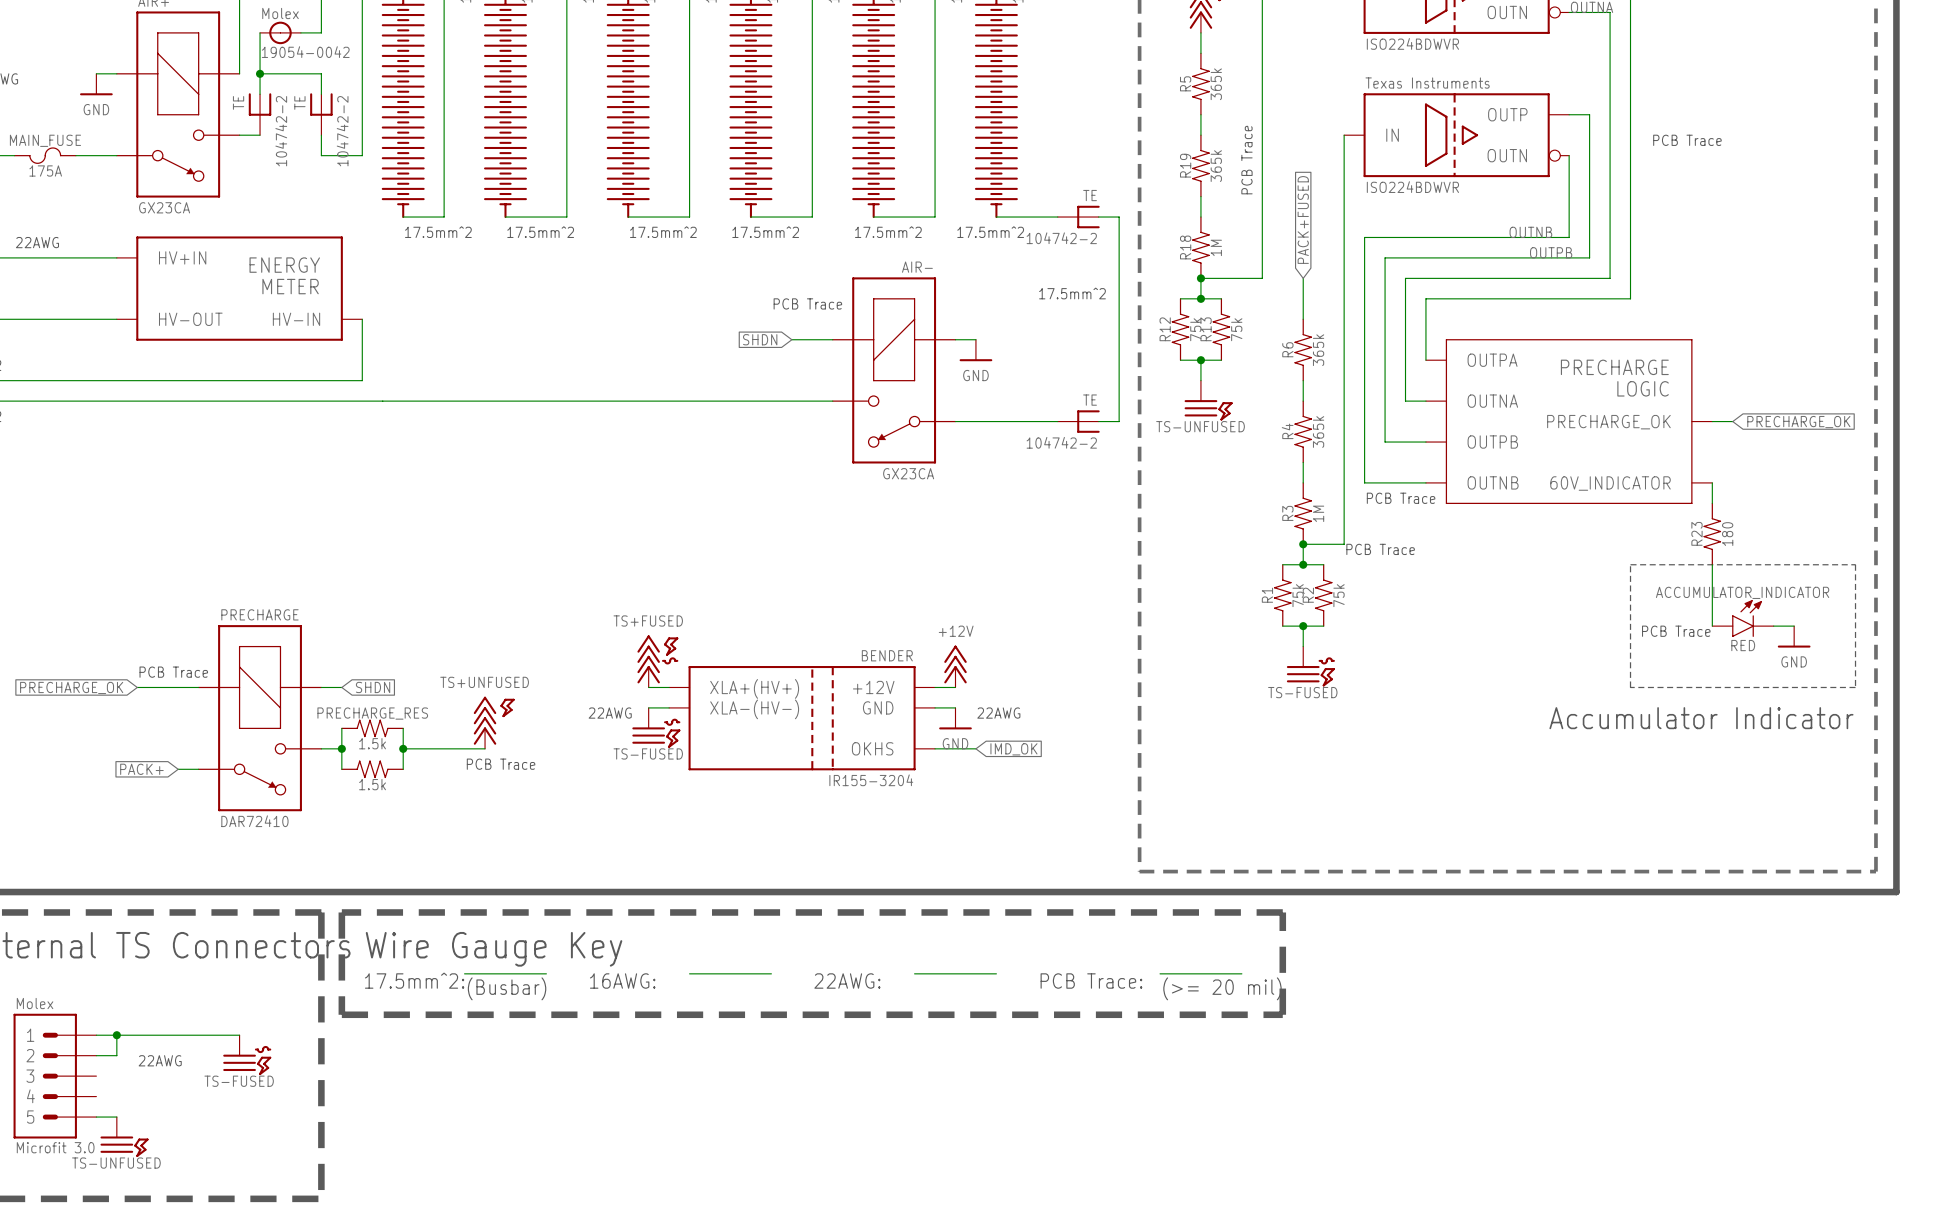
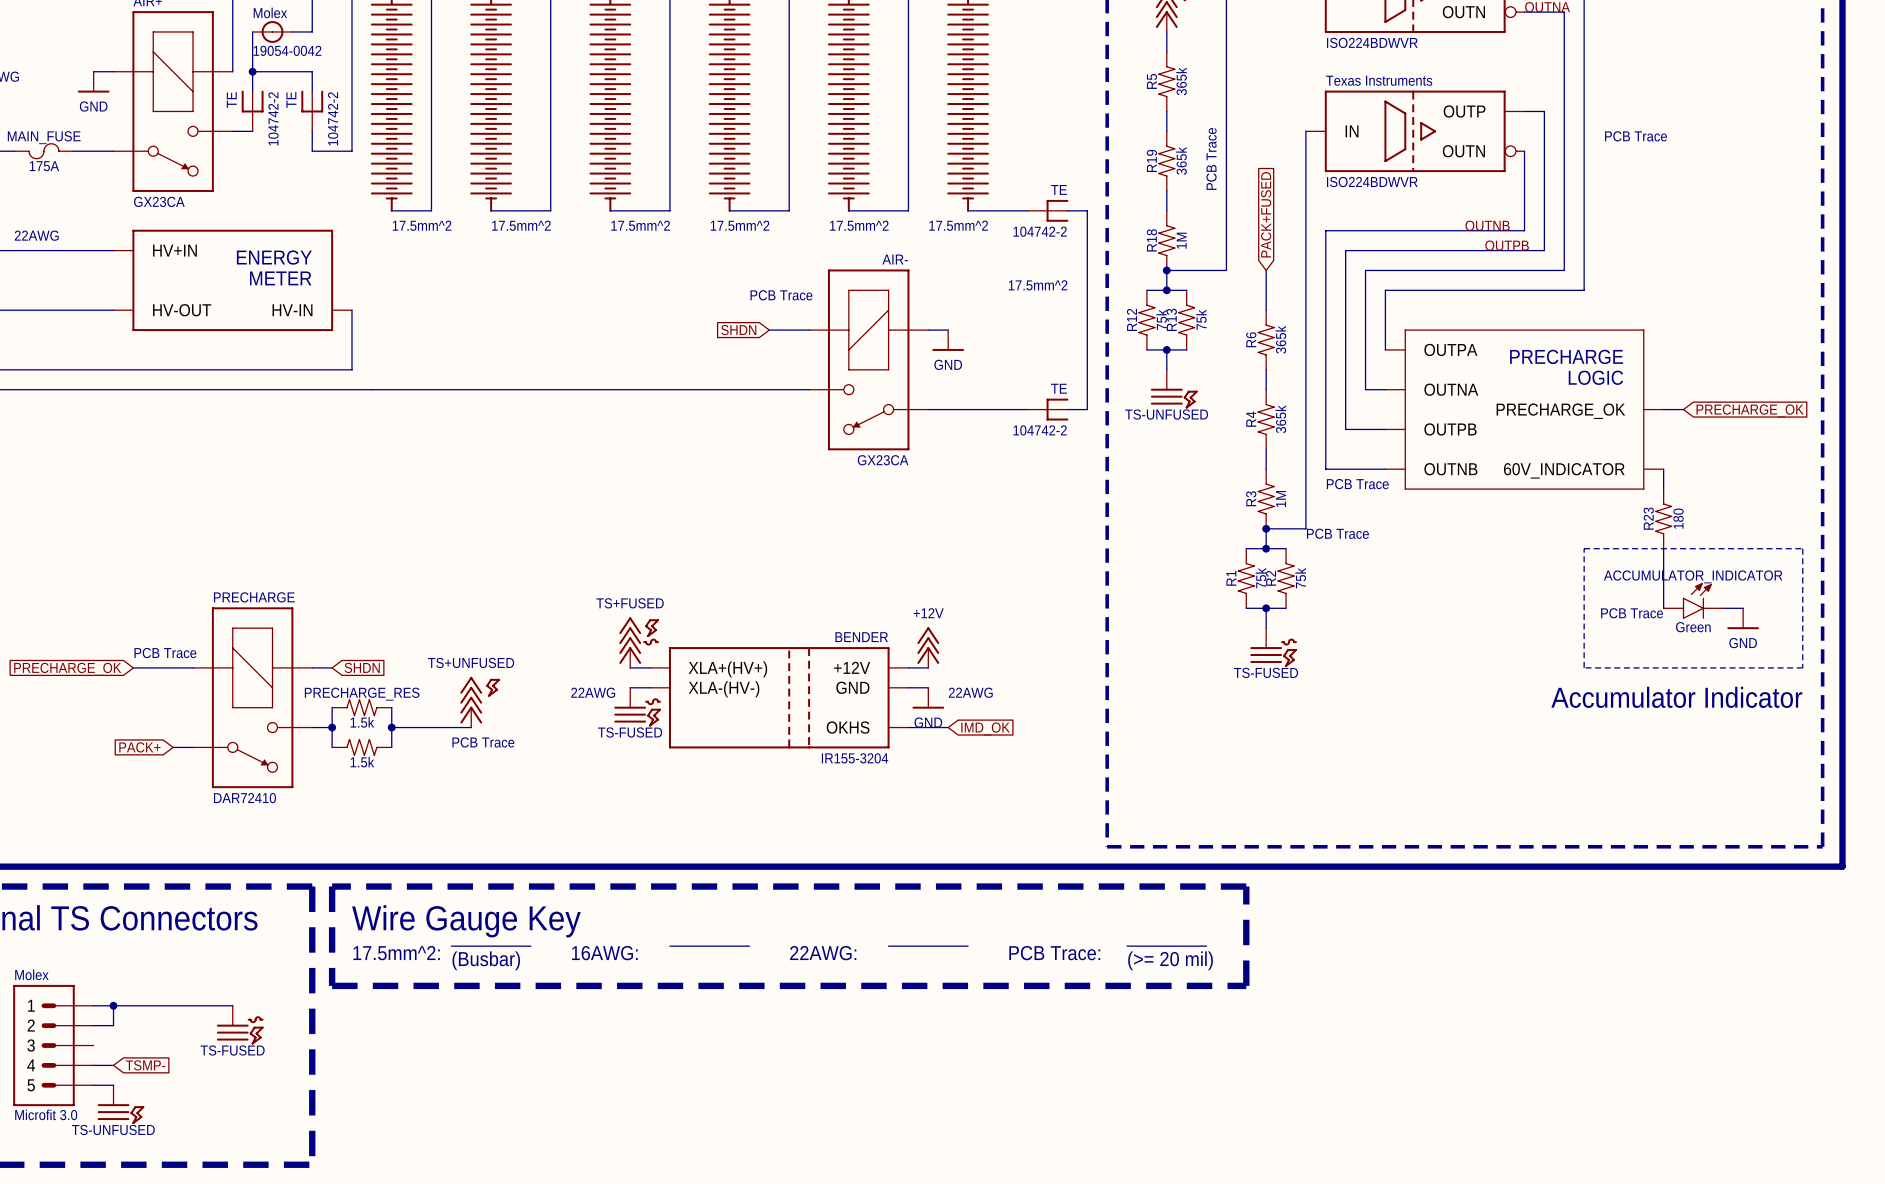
ACCUMULATOR_INDICATOR text: RED (1743, 645) -> Green (1693, 627)
text: 22AWG (160, 1060) -> none
wire: none -> (93, 1065) (113, 1065)
global label: none -> TSMP- (145, 1065)

